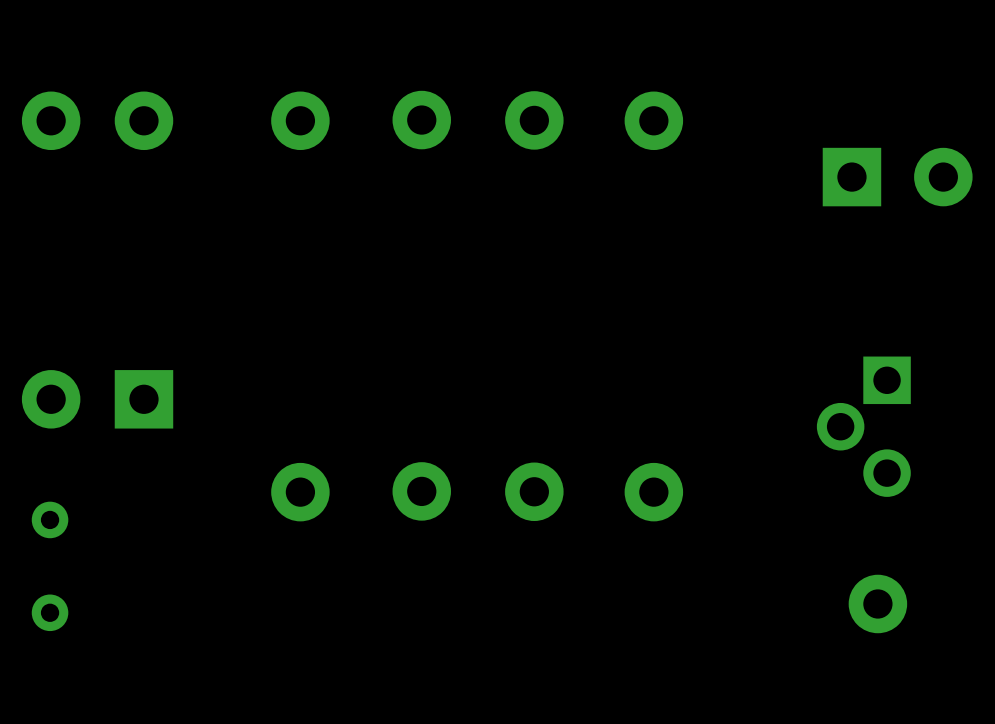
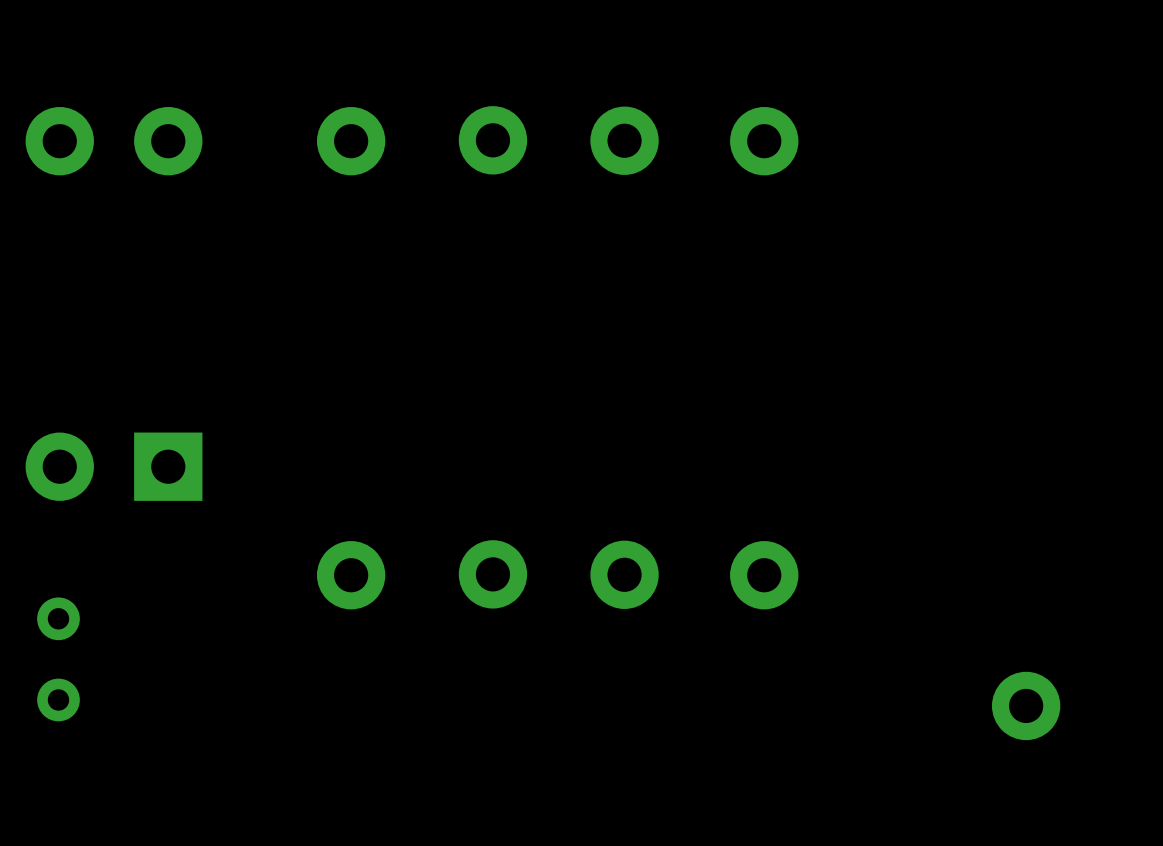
part: (897, 177) -> none
part: (863, 426) -> none
part footprint: [31, 501, 69, 632] -> [37, 597, 80, 722]

